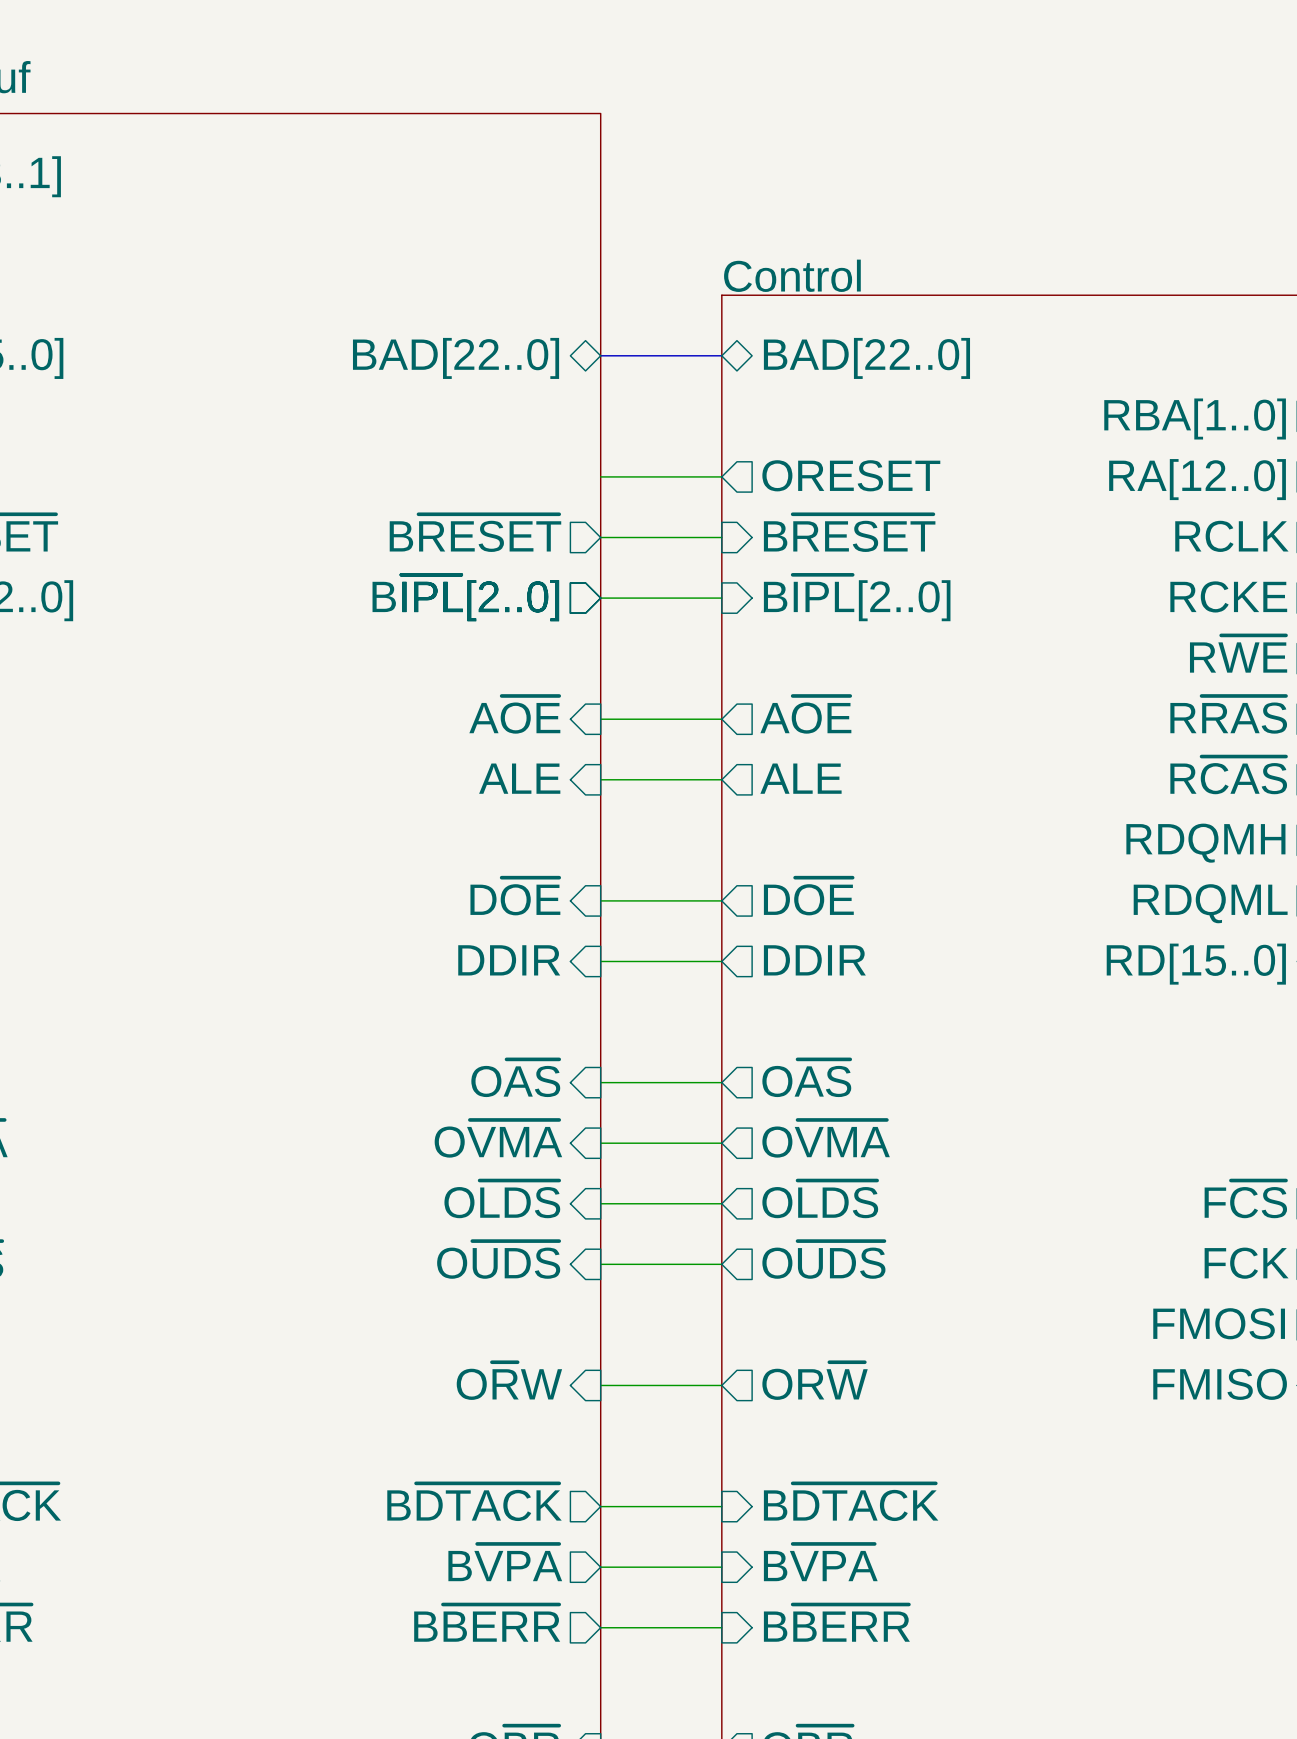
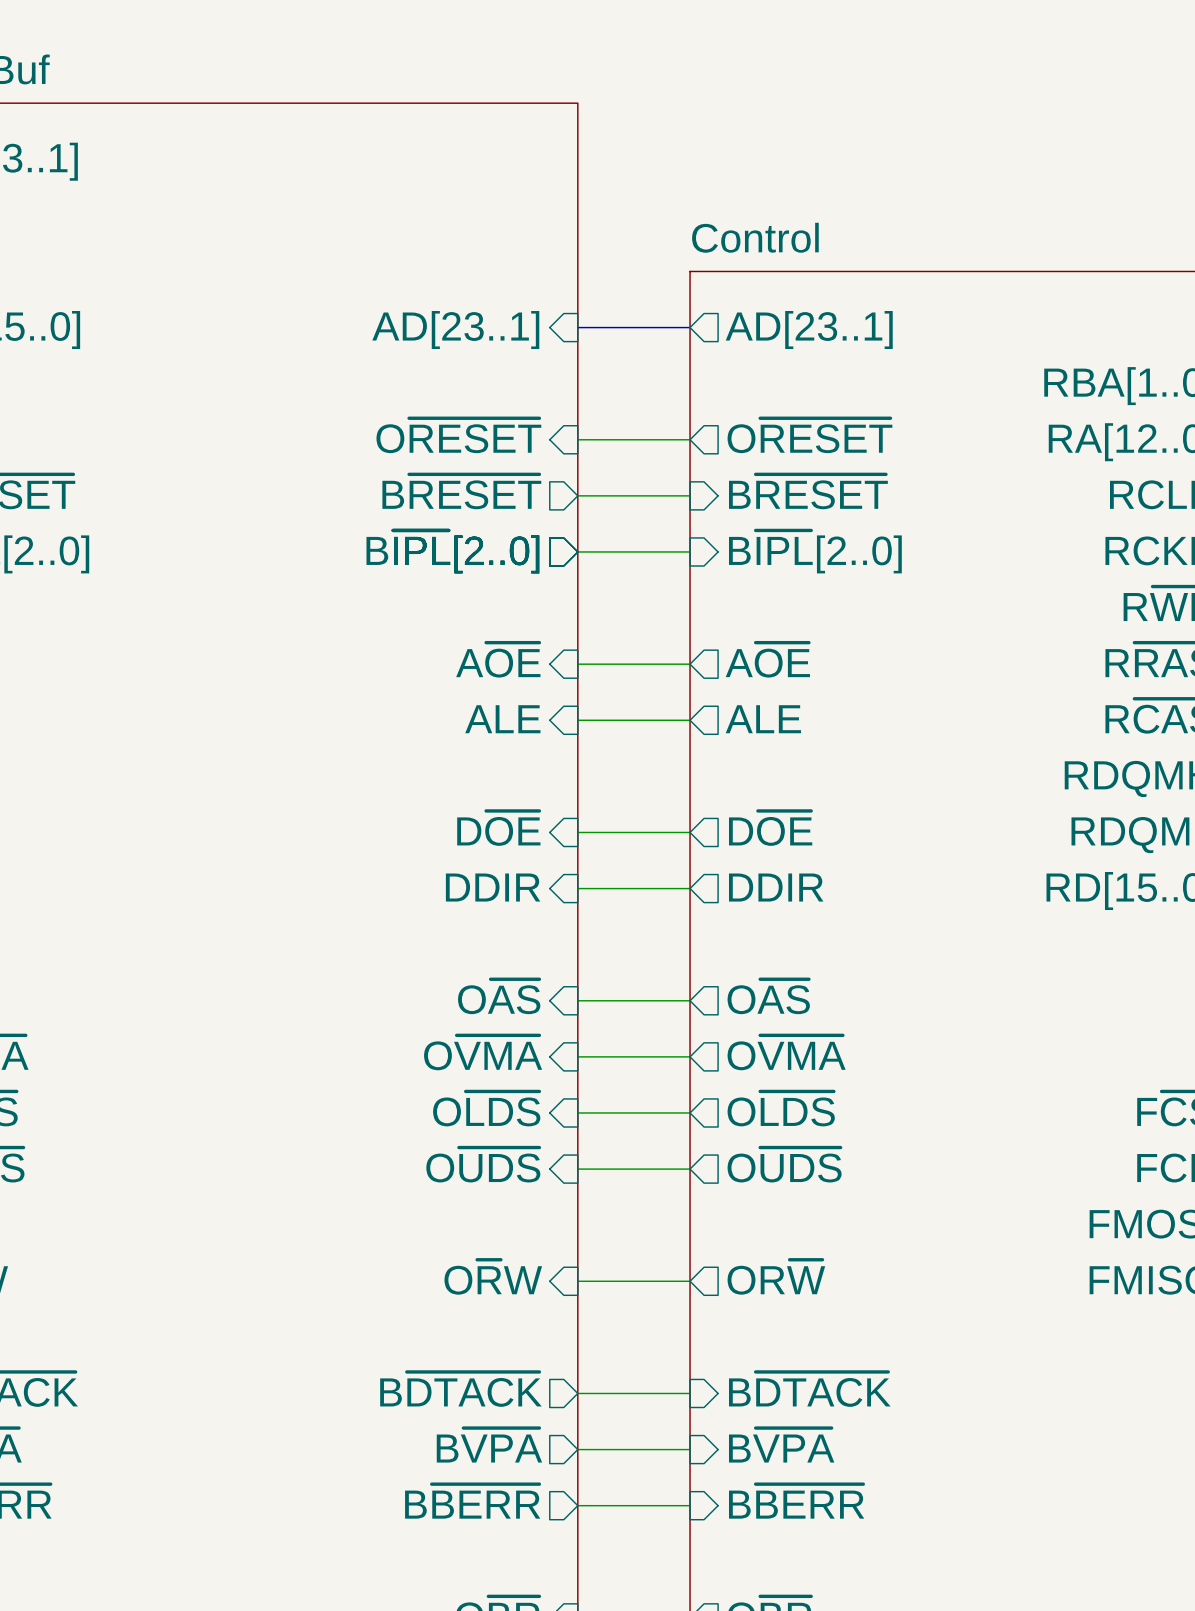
sheet Control name position: Control (792, 275) -> Control (755, 237)
sheet pin shape: bidirectional (456, 358) -> input (455, 330)
sheet pin: BAD[22..0] (456, 358) -> AD[23..1] (455, 330)
sheet pin shape: bidirectional (866, 358) -> output (809, 330)
sheet pin: BAD[22..0] (866, 358) -> AD[23..1] (809, 330)
sheet pin: none -> O~{RESET} (458, 435)
sheet pin: ORESET (851, 475) -> O~{RESET} (809, 435)

